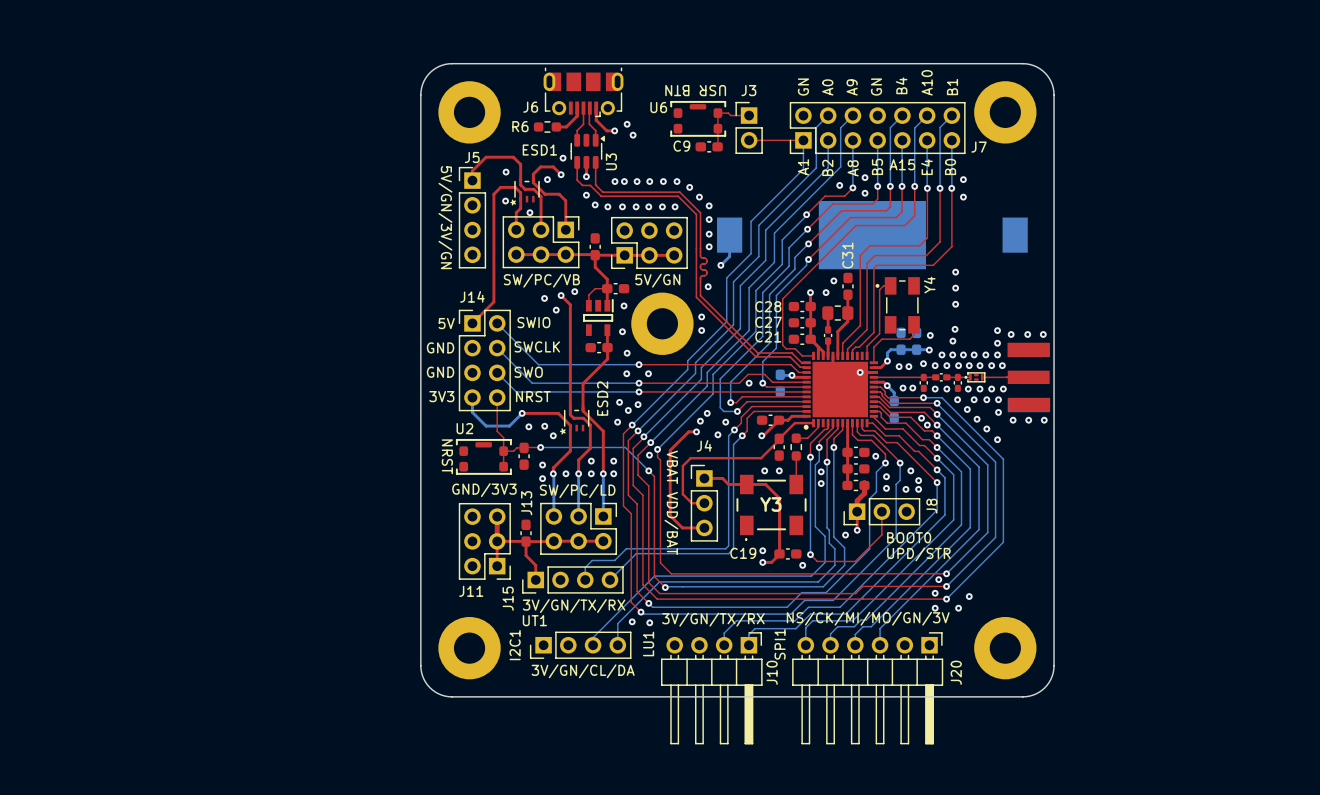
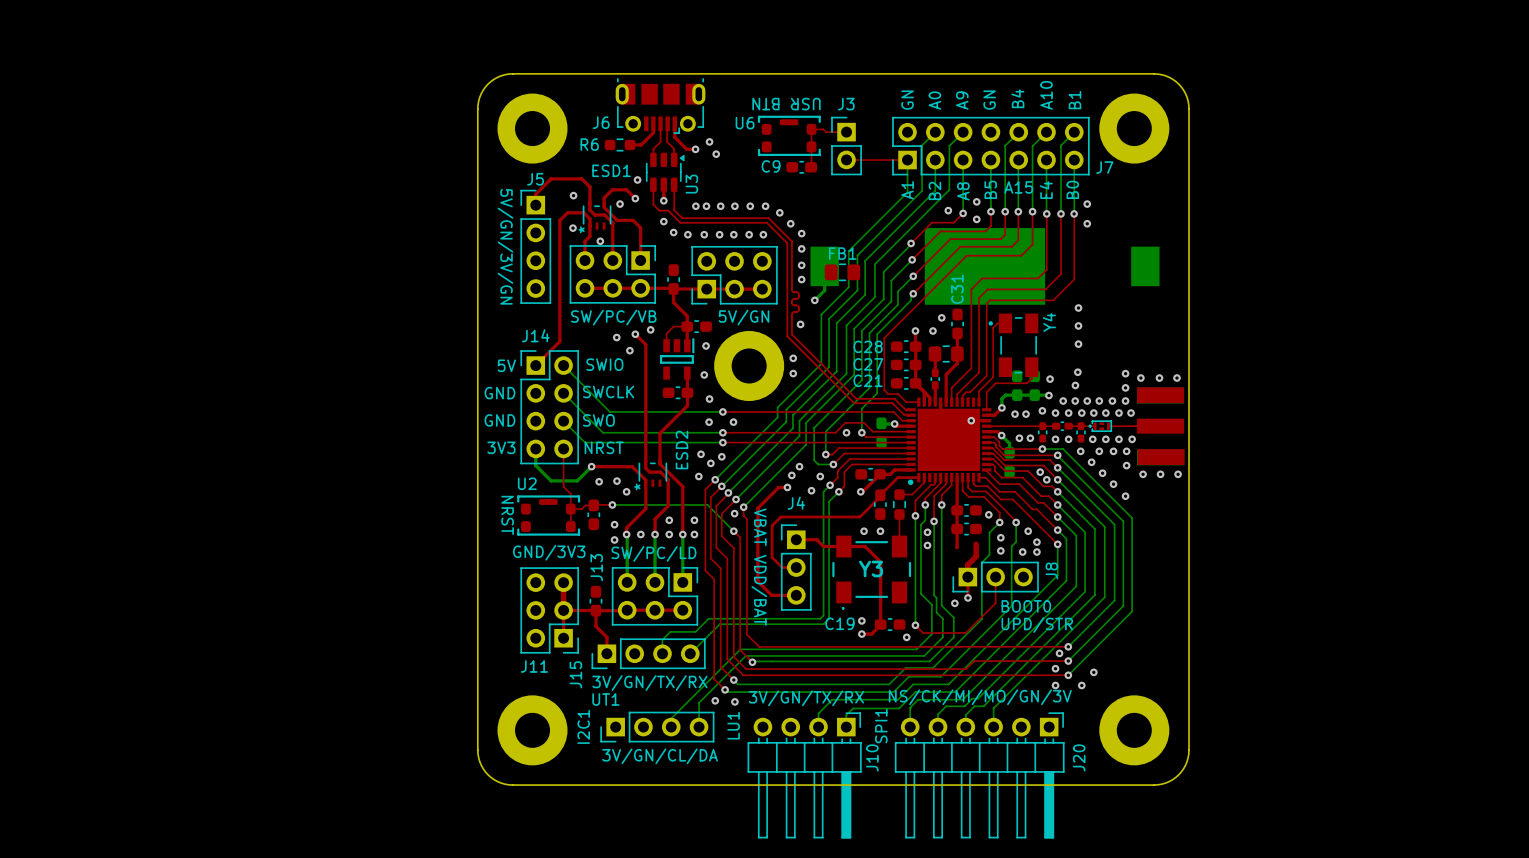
FB1: none -> (842, 272)
part: (855, 485) -> none

